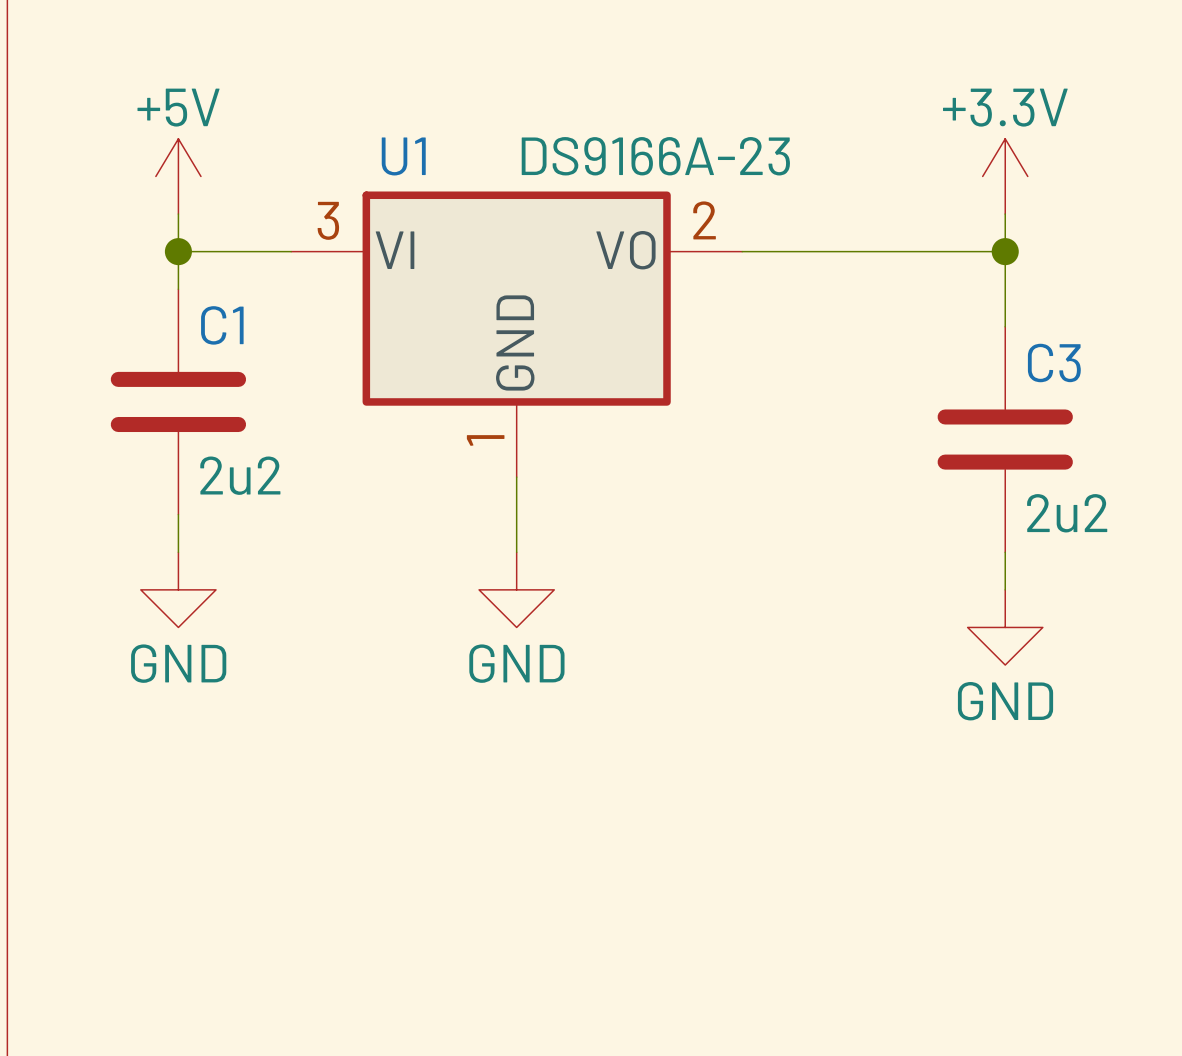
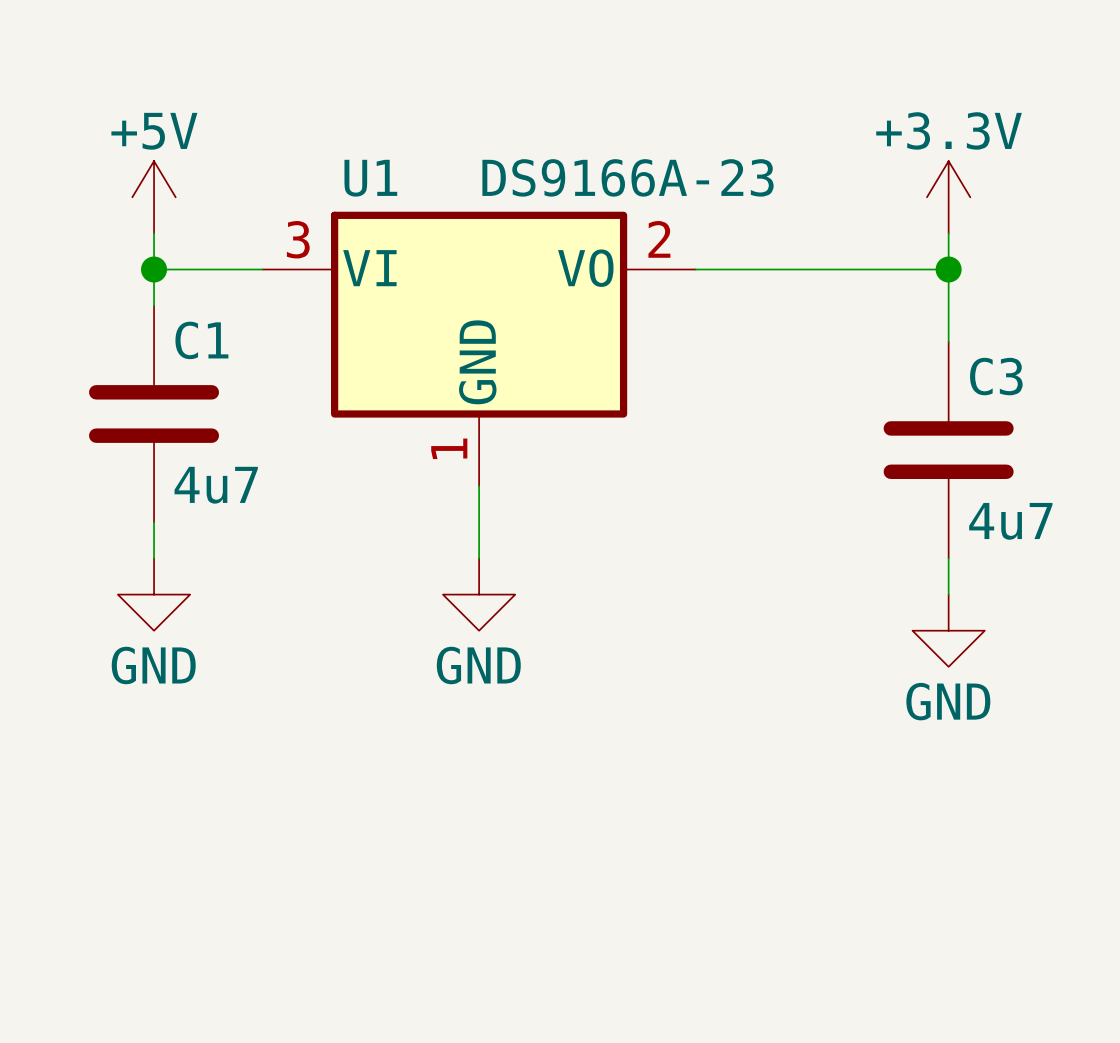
C1 value: 2u2 (240, 475) -> 4u7 (216, 485)
C3 value: 2u2 (1067, 513) -> 4u7 (1010, 521)

